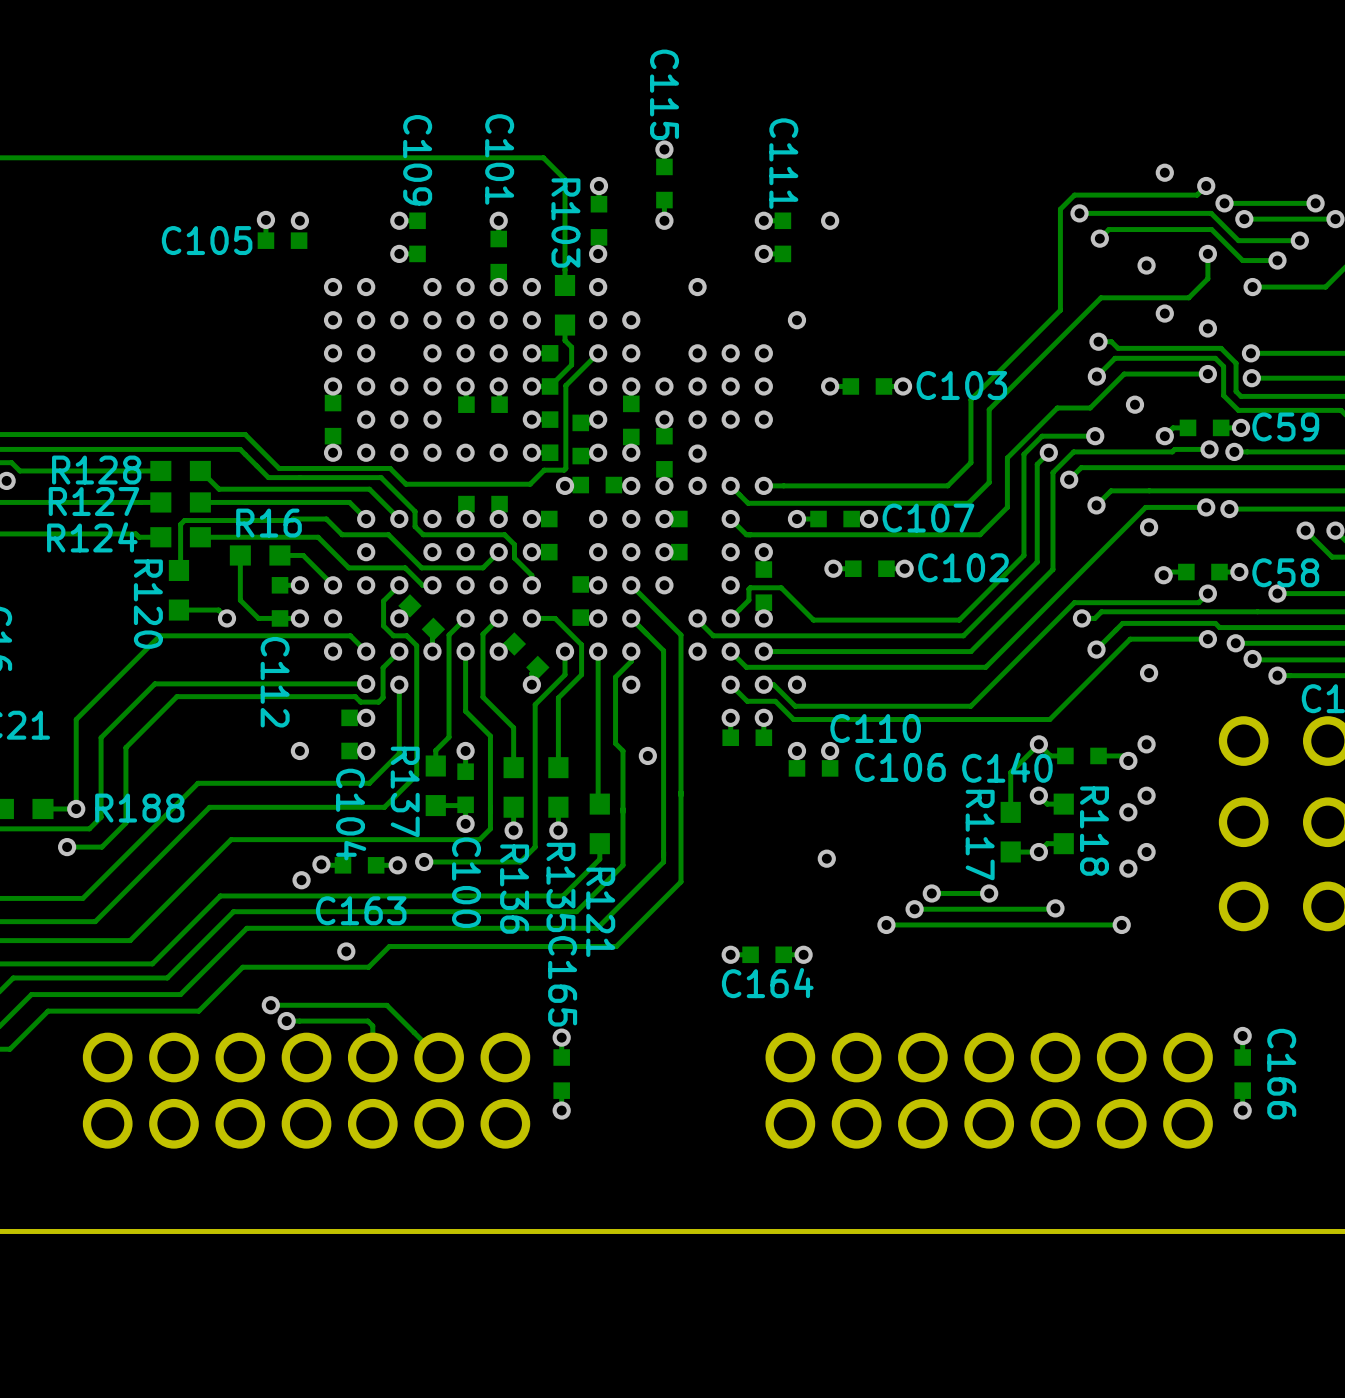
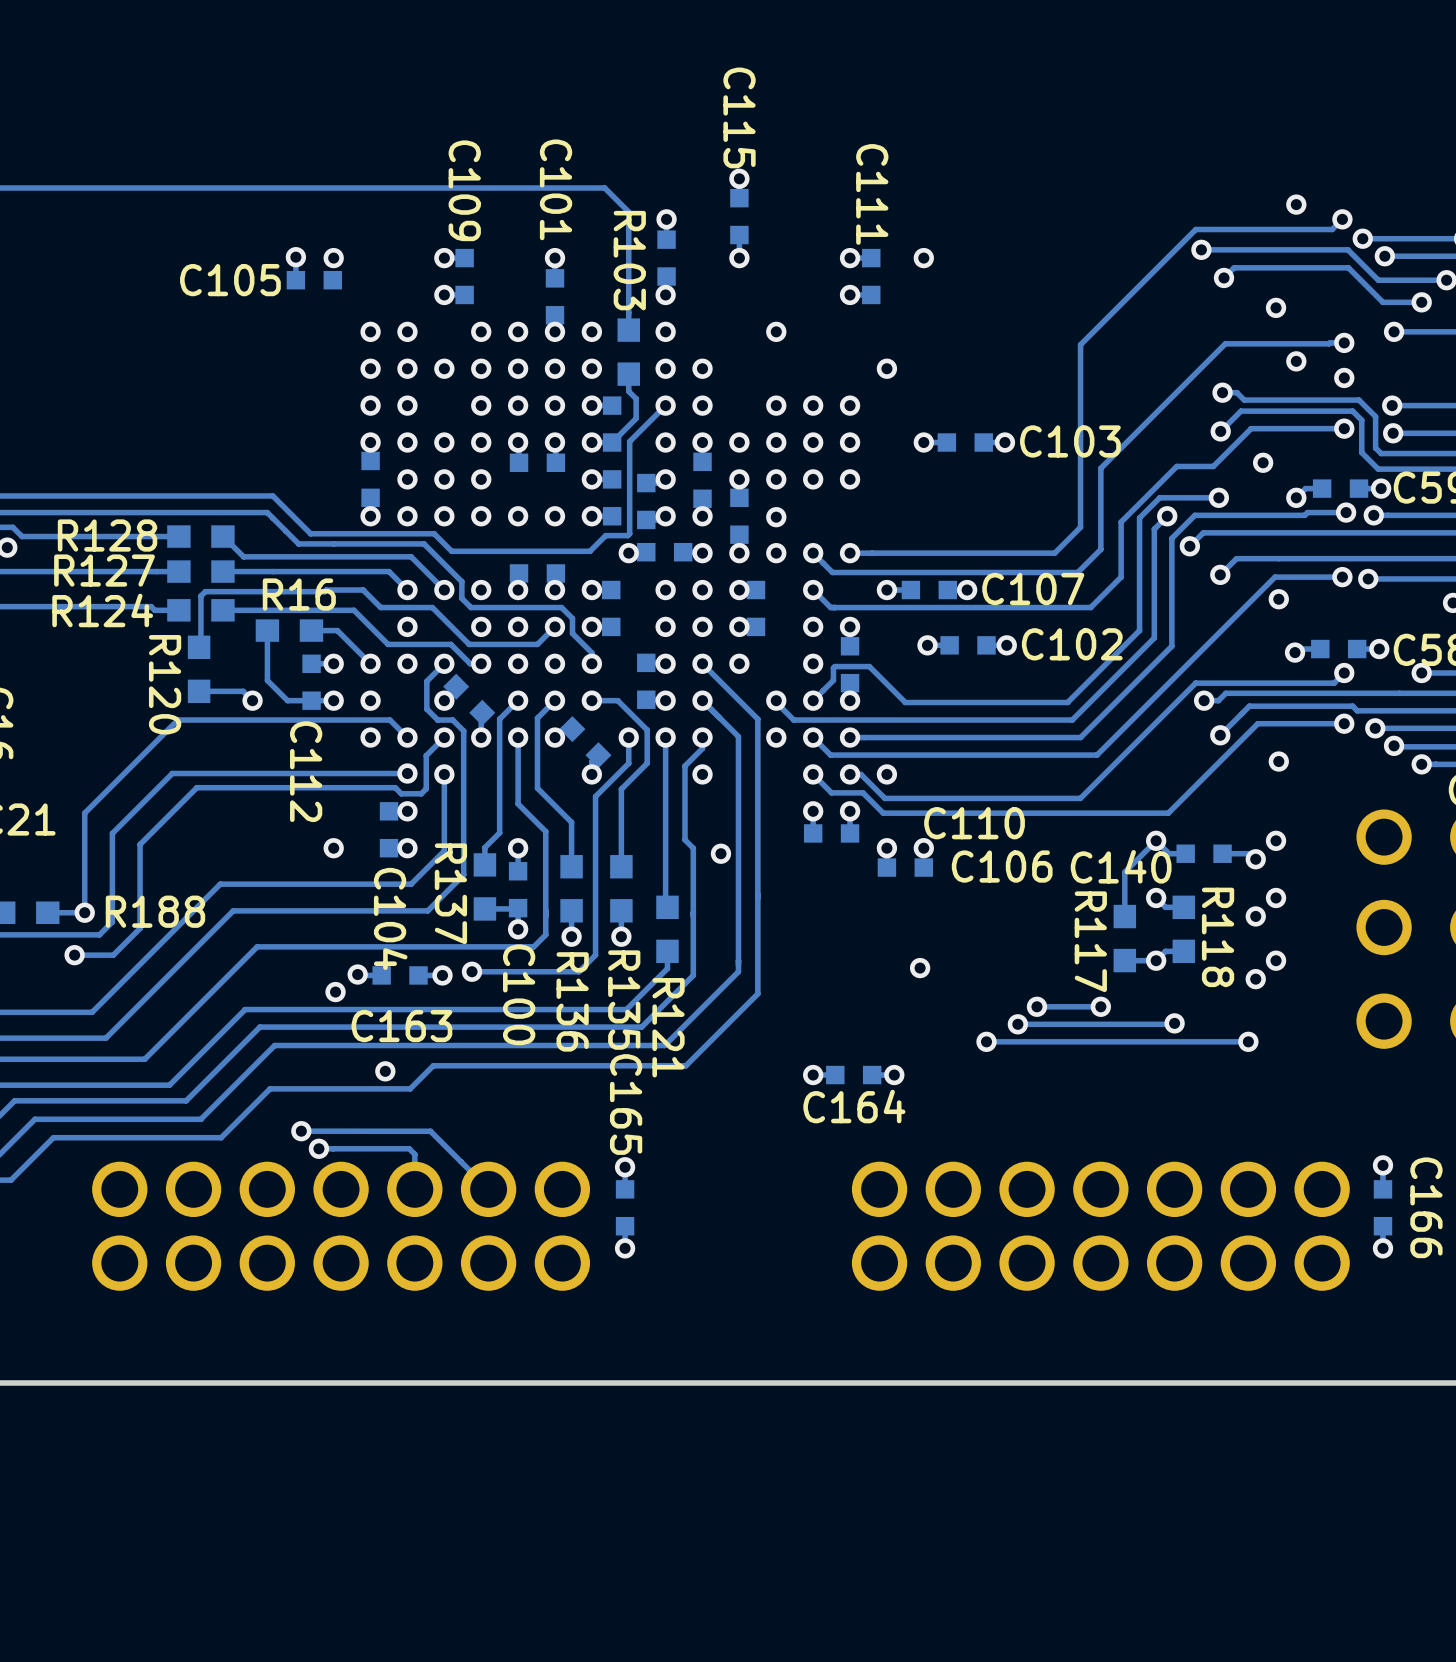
track: (1060, 209) (1060, 310) (970, 399) -> (1180, 245) (1080, 344) (1080, 457)
track: (1207, 253) (1207, 278) (1188, 297) -> (1344, 342) (1323, 343)
via position: (1207, 253) -> (1344, 342)

